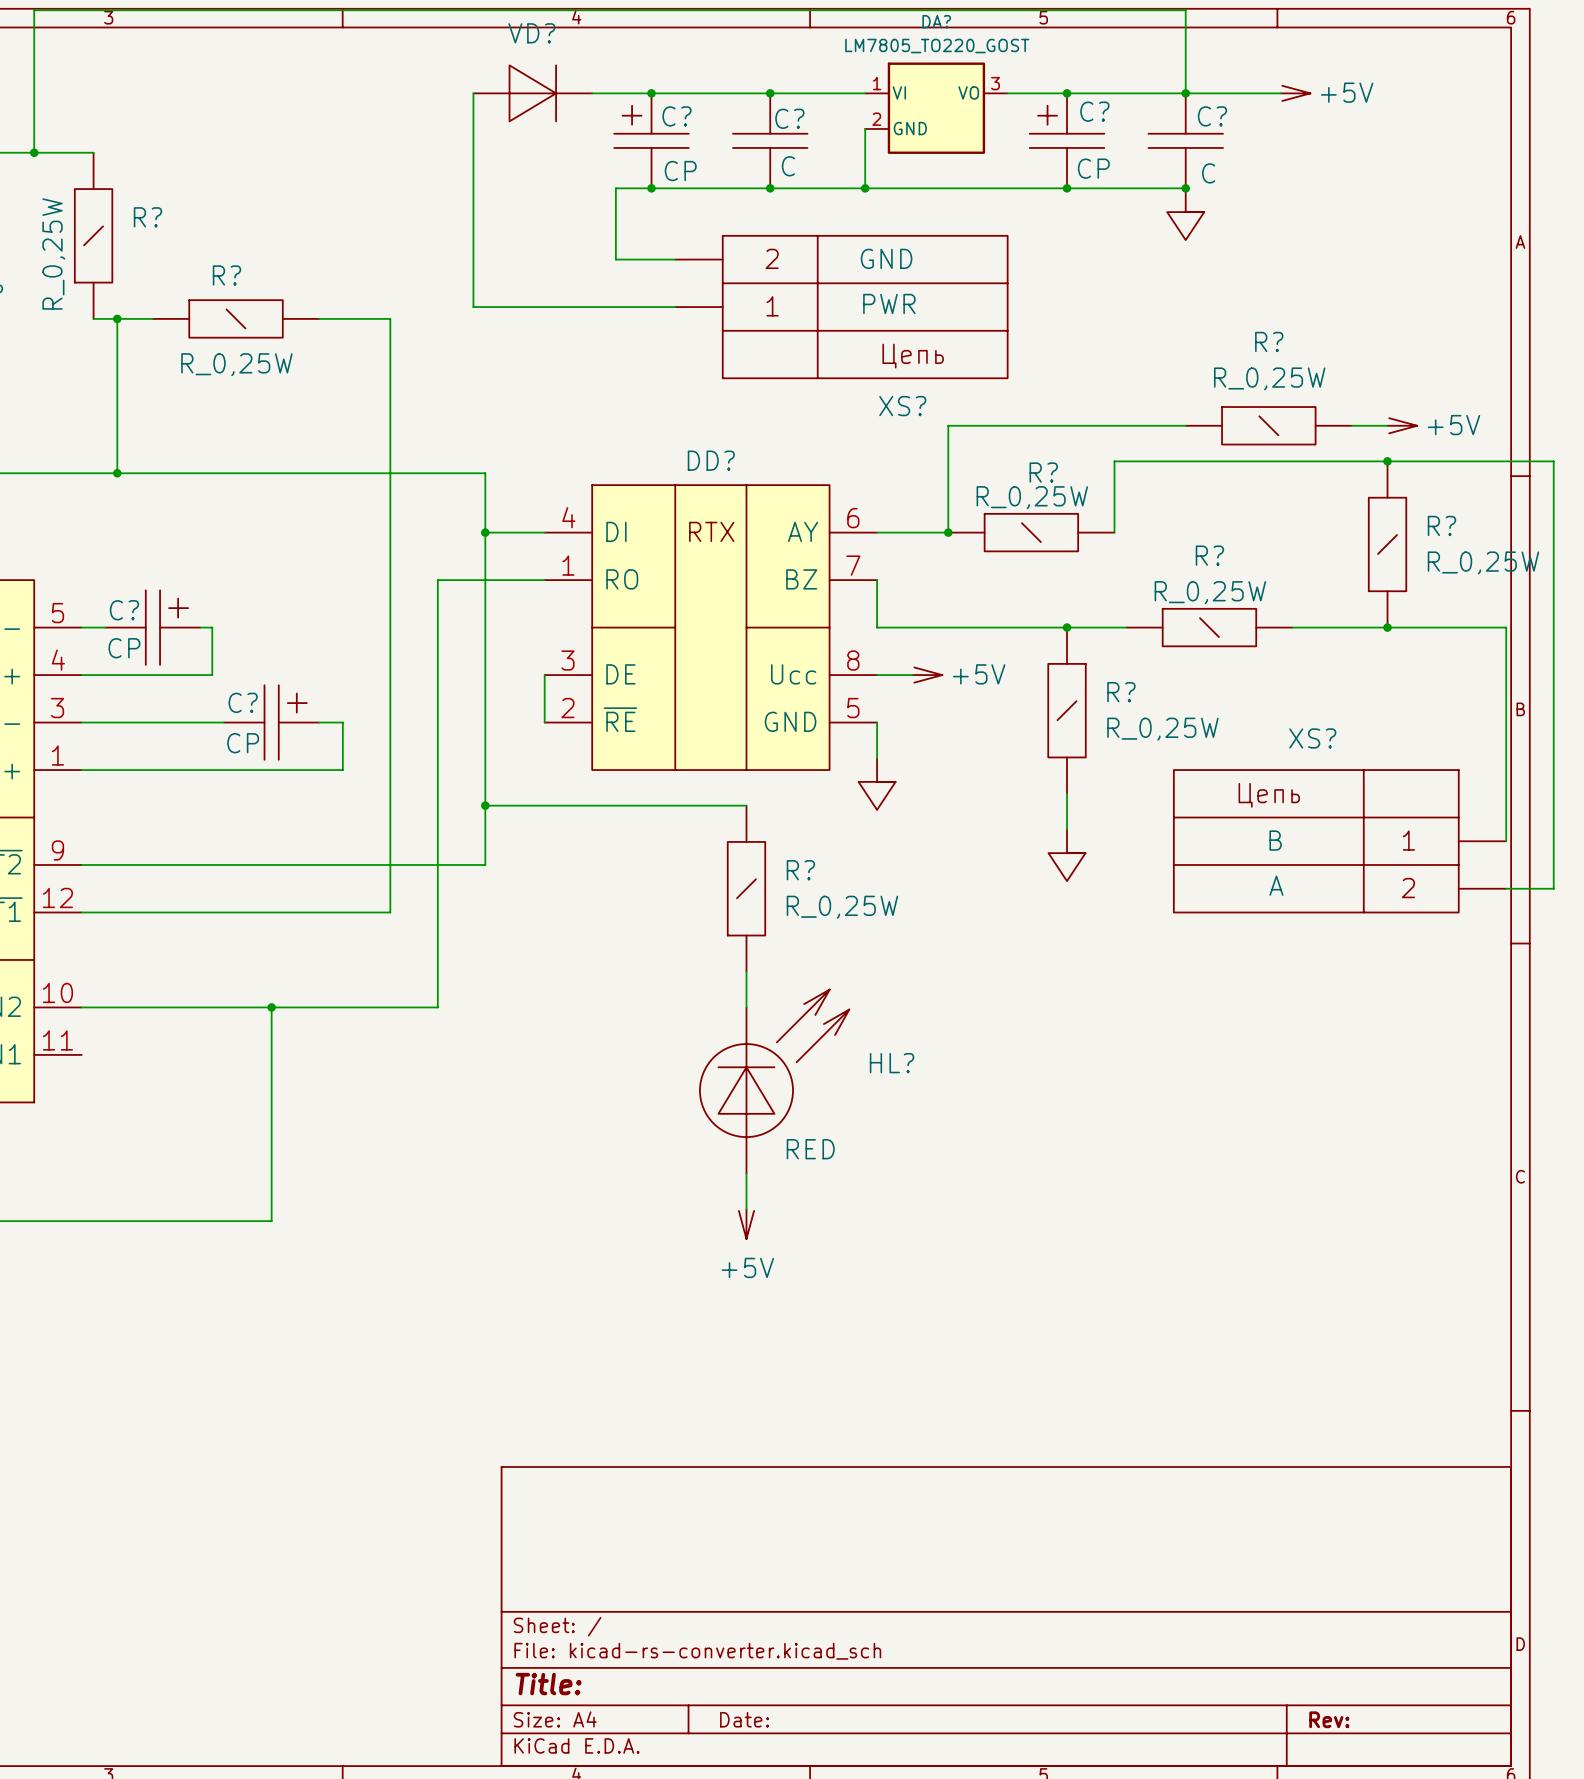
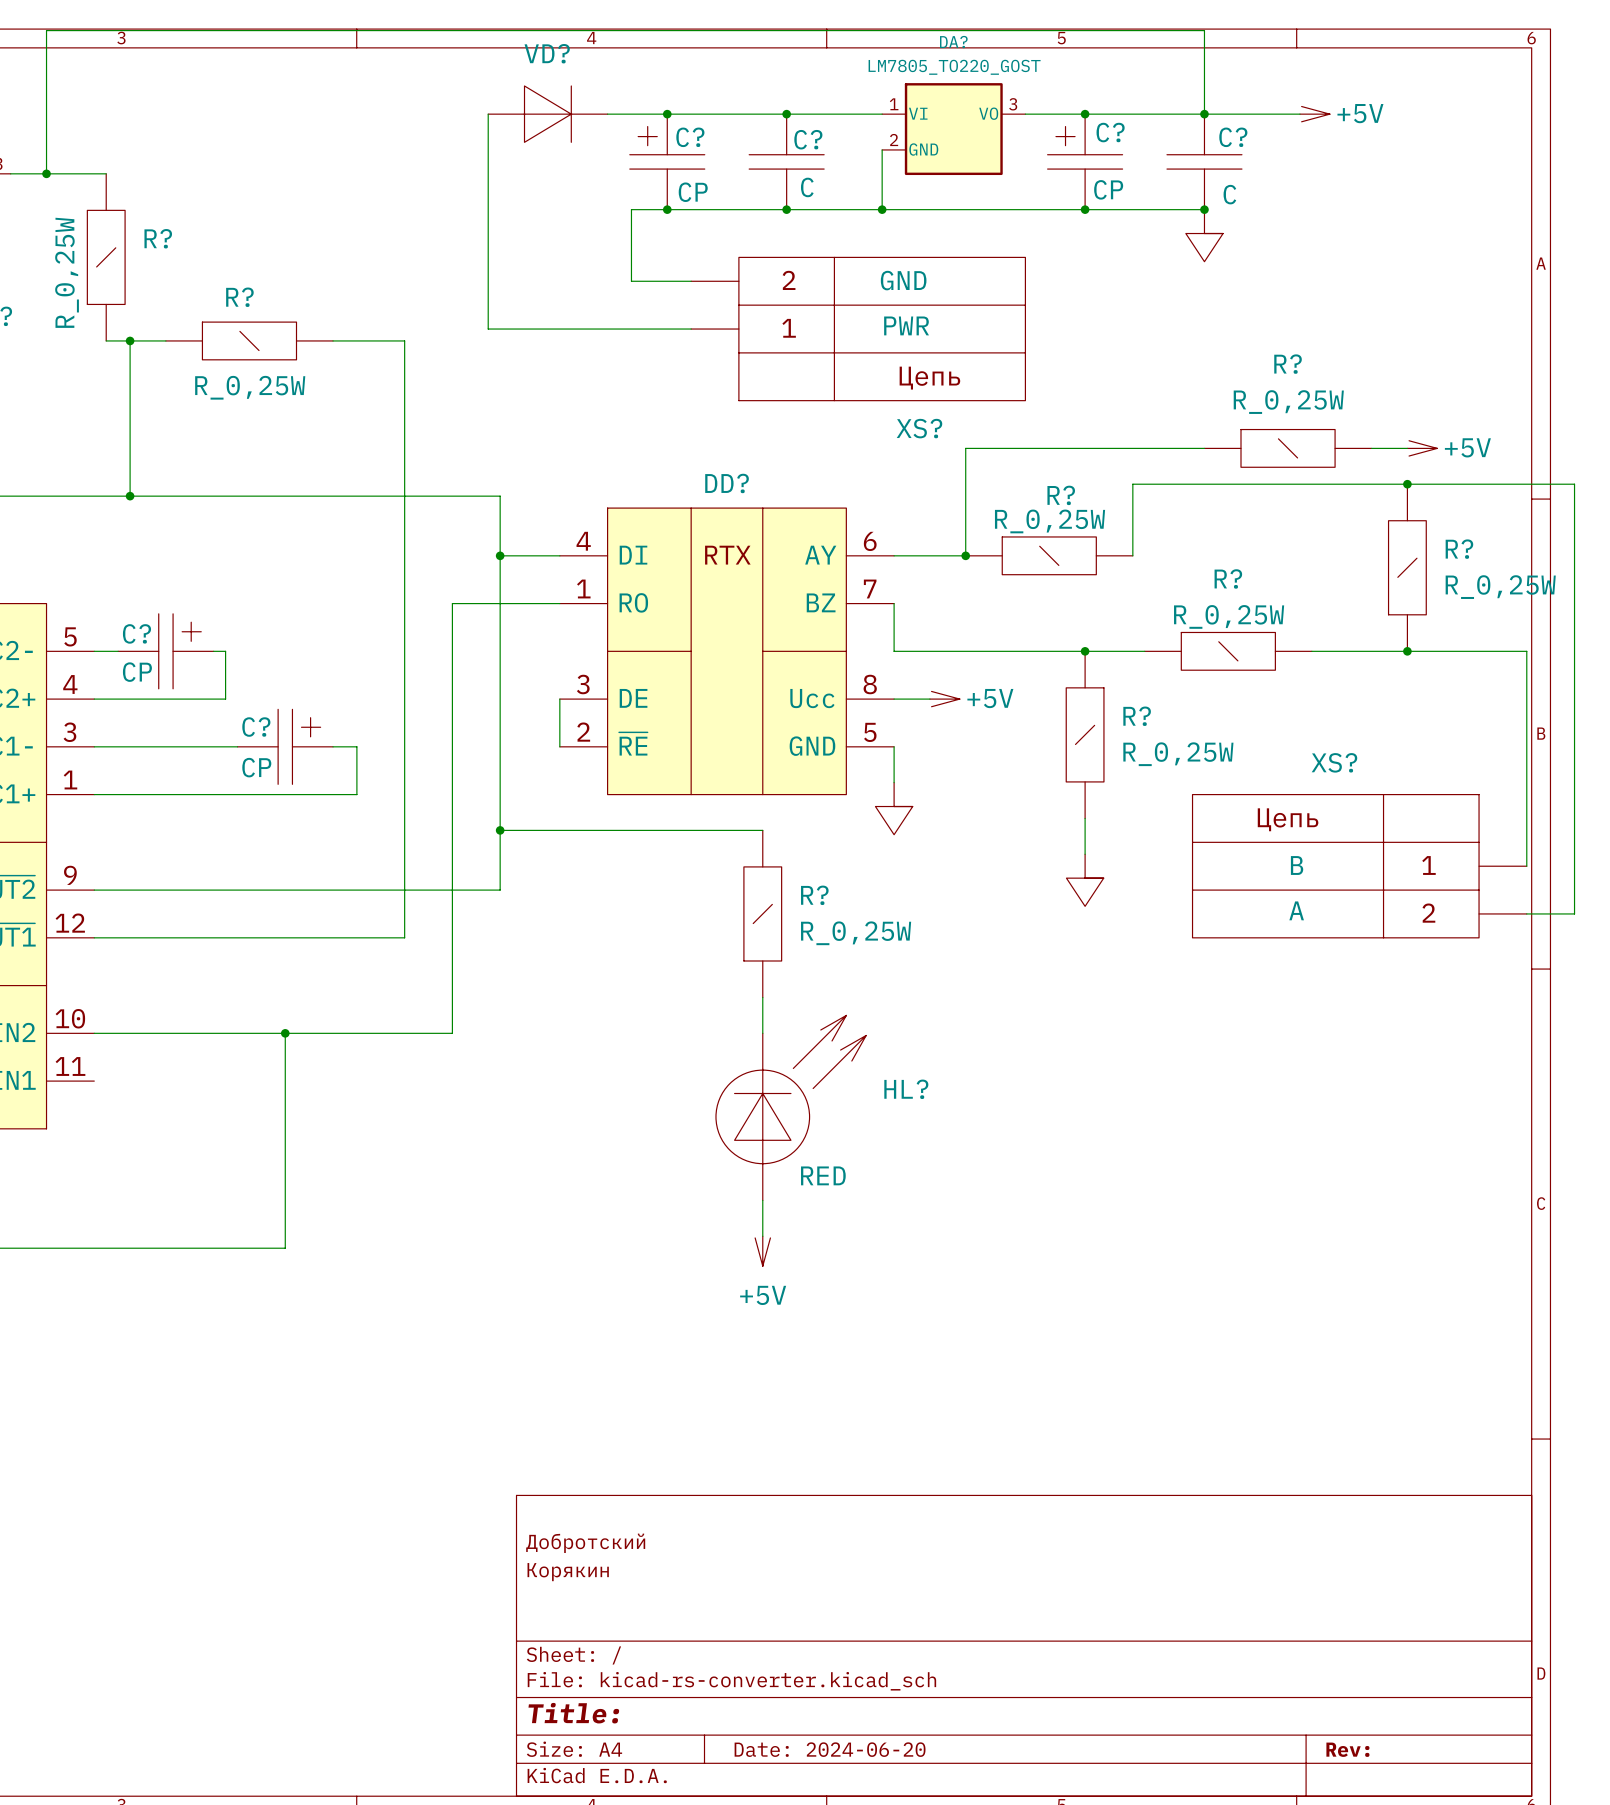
title block: none -> Добротский (585, 1543)
title block: none -> Корякин (568, 1572)
title block: Date: (744, 1719) -> Date: 2024-06-20 (830, 1749)

